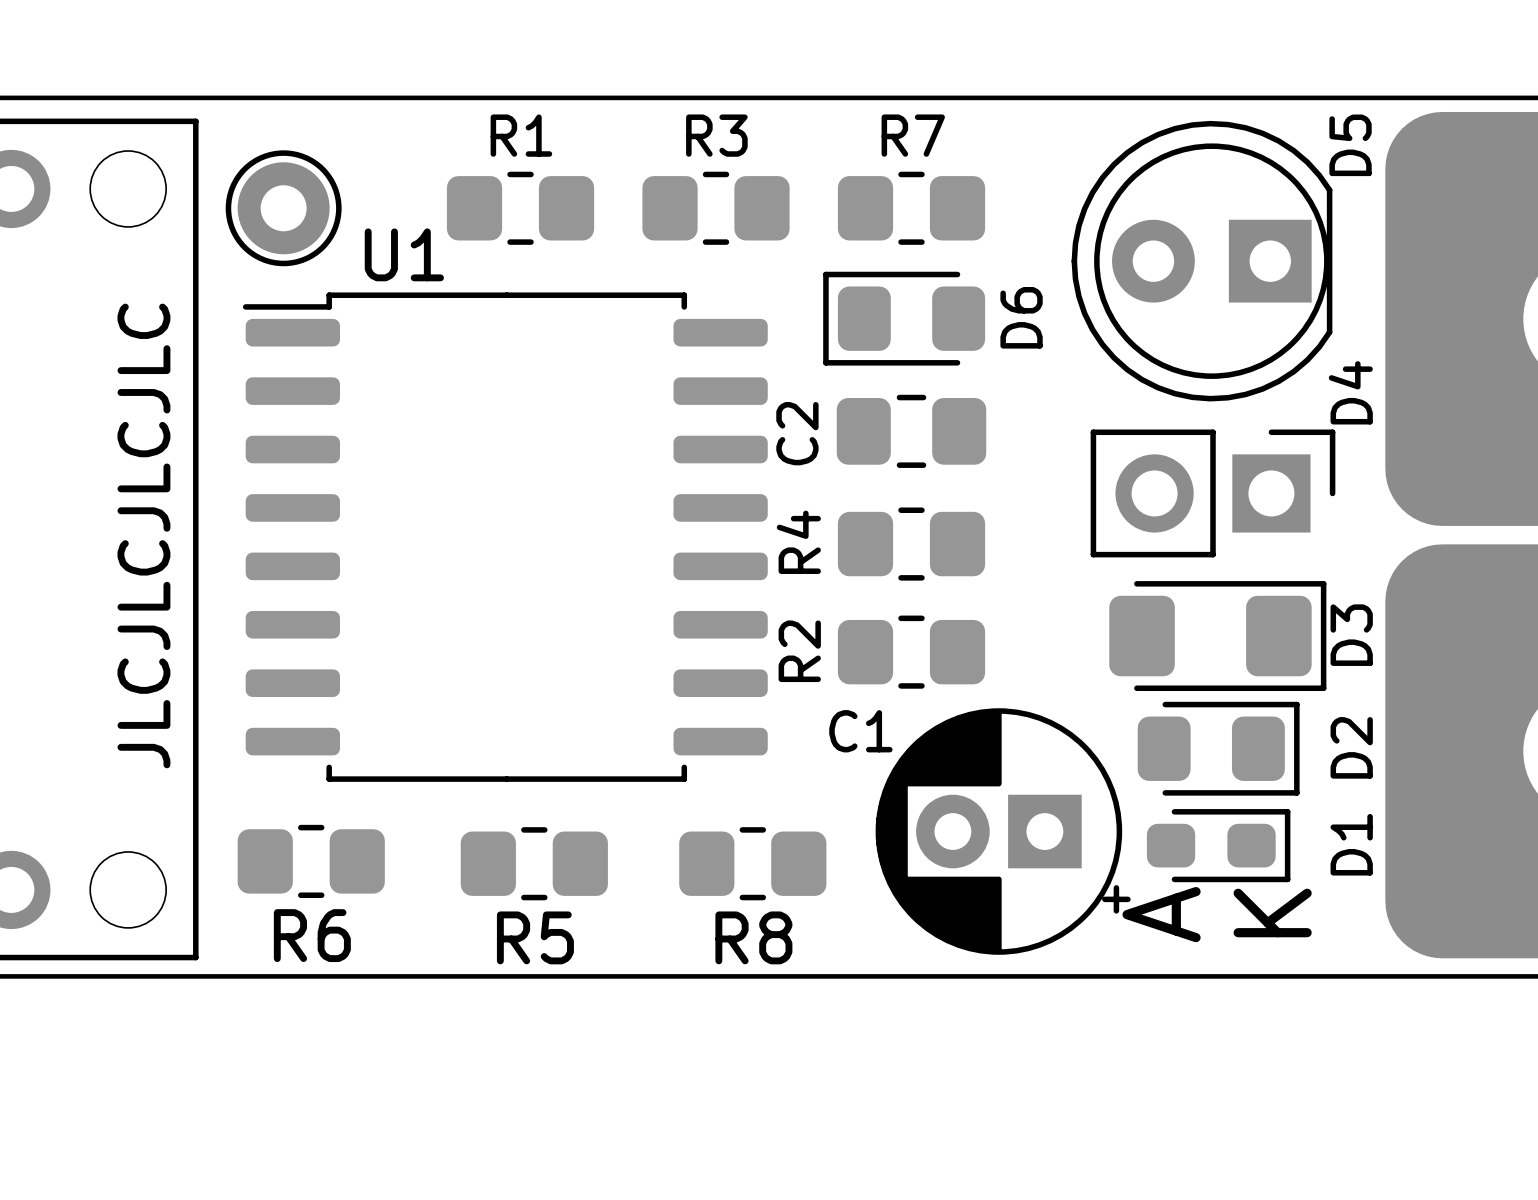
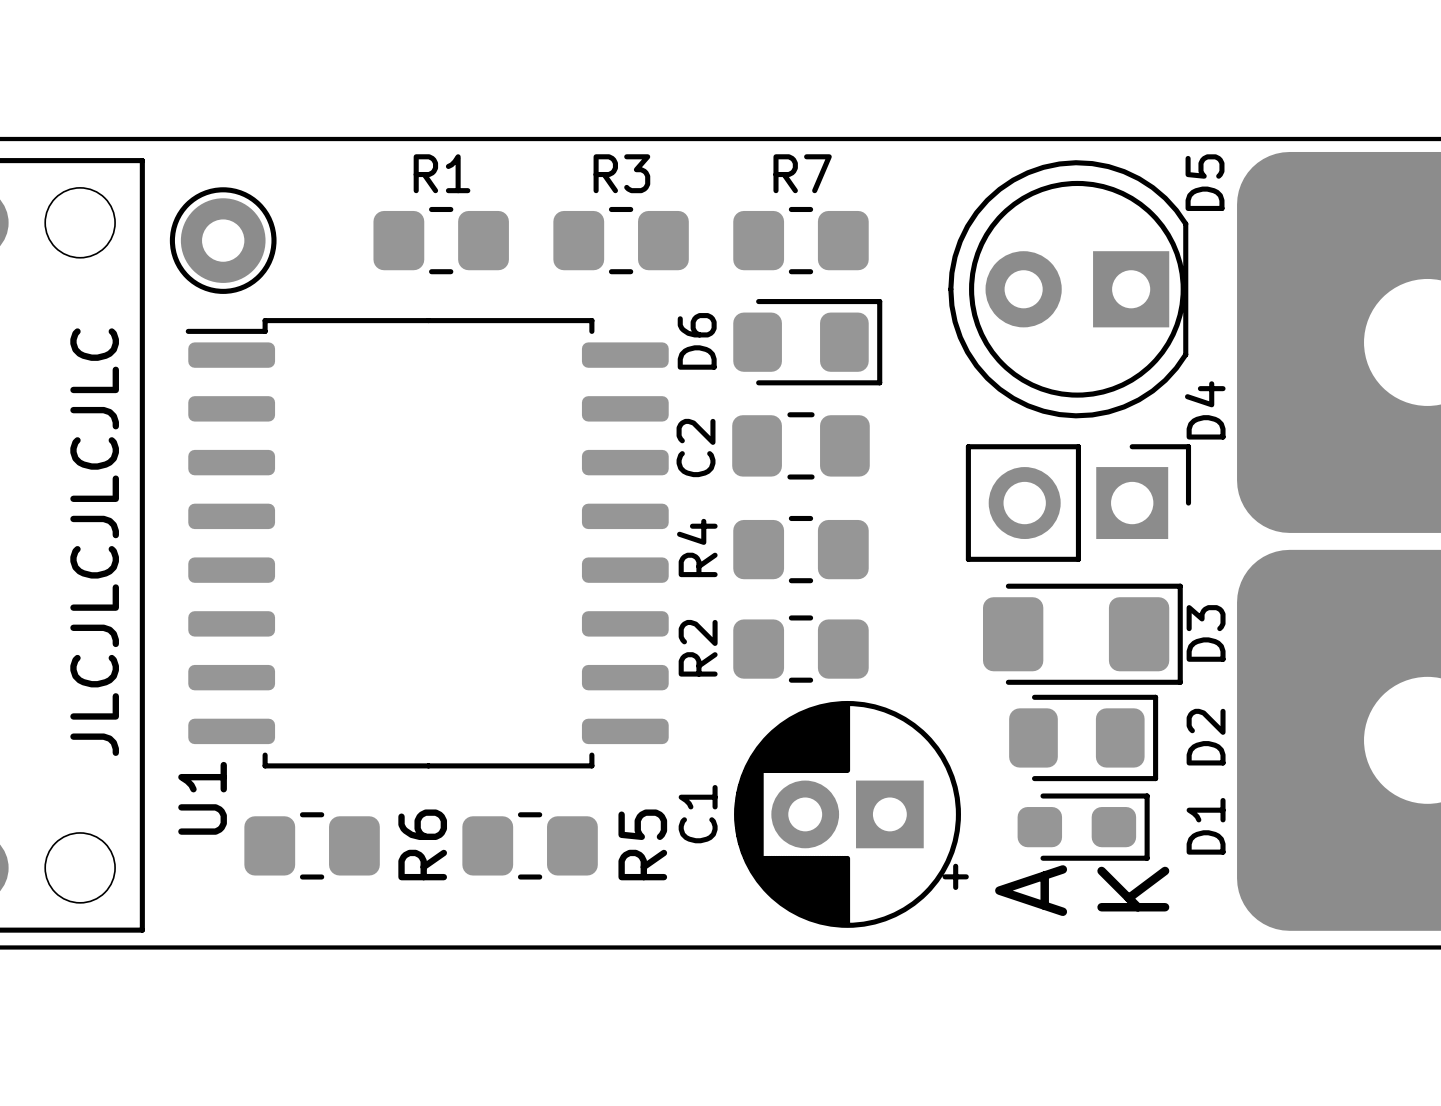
U1 name rotation: 0° (404, 254) -> 90° counterclockwise (202, 798)
U1 name position: U1 (404, 254) -> U1 (202, 798)
D6 rotation: 0° (904, 318) -> 180° (807, 342)
C1 name rotation: 0° (860, 731) -> 90° counterclockwise (698, 814)
C1 name position: C1 (860, 731) -> C1 (698, 814)
C1 position: (1003, 831) -> (851, 814)
R6 position: (311, 861) -> (312, 845)
R5 position: (534, 863) -> (530, 845)
R8: (752, 863) -> none
R6 name rotation: 0° (312, 935) -> 90° counterclockwise (422, 844)
R6 name position: R6 (312, 935) -> R6 (422, 844)
R5 name rotation: 0° (535, 937) -> 90° counterclockwise (642, 844)
R5 name position: R5 (535, 937) -> R5 (642, 844)

